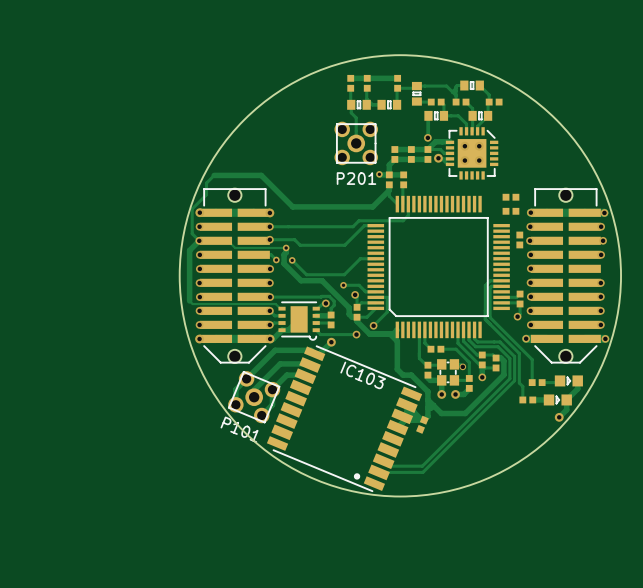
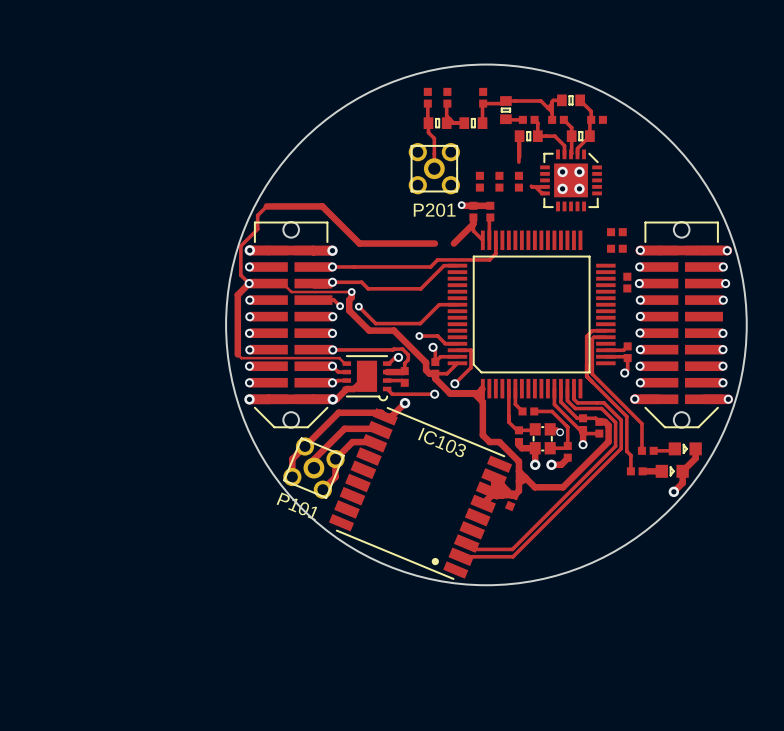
track: (350, 78) (397, 78) -> none
via: (427, 137) -> none
track: (450, 141) (435, 141) (427, 149) -> none
track: (394, 149) (427, 149) -> none
track: (427, 149) (440, 149) (444, 153) (450, 153) -> none
via: (438, 158) -> none
track: (427, 159) (394, 159) (389, 164) (389, 174) -> none
track: (356, 206) (372, 206) -> none

